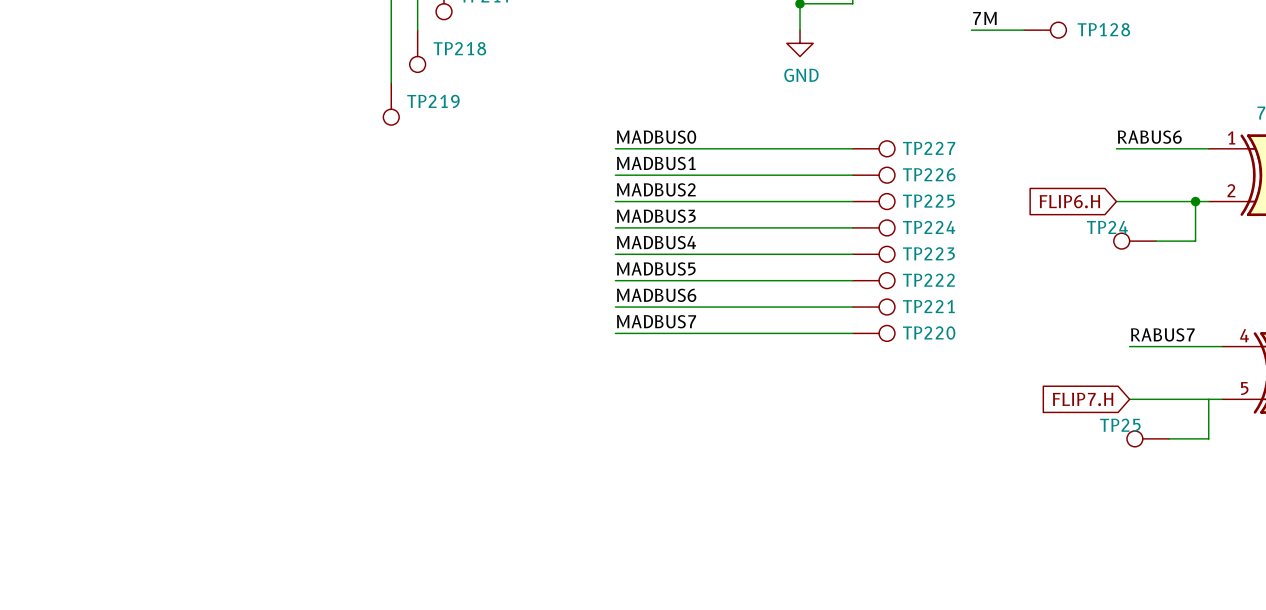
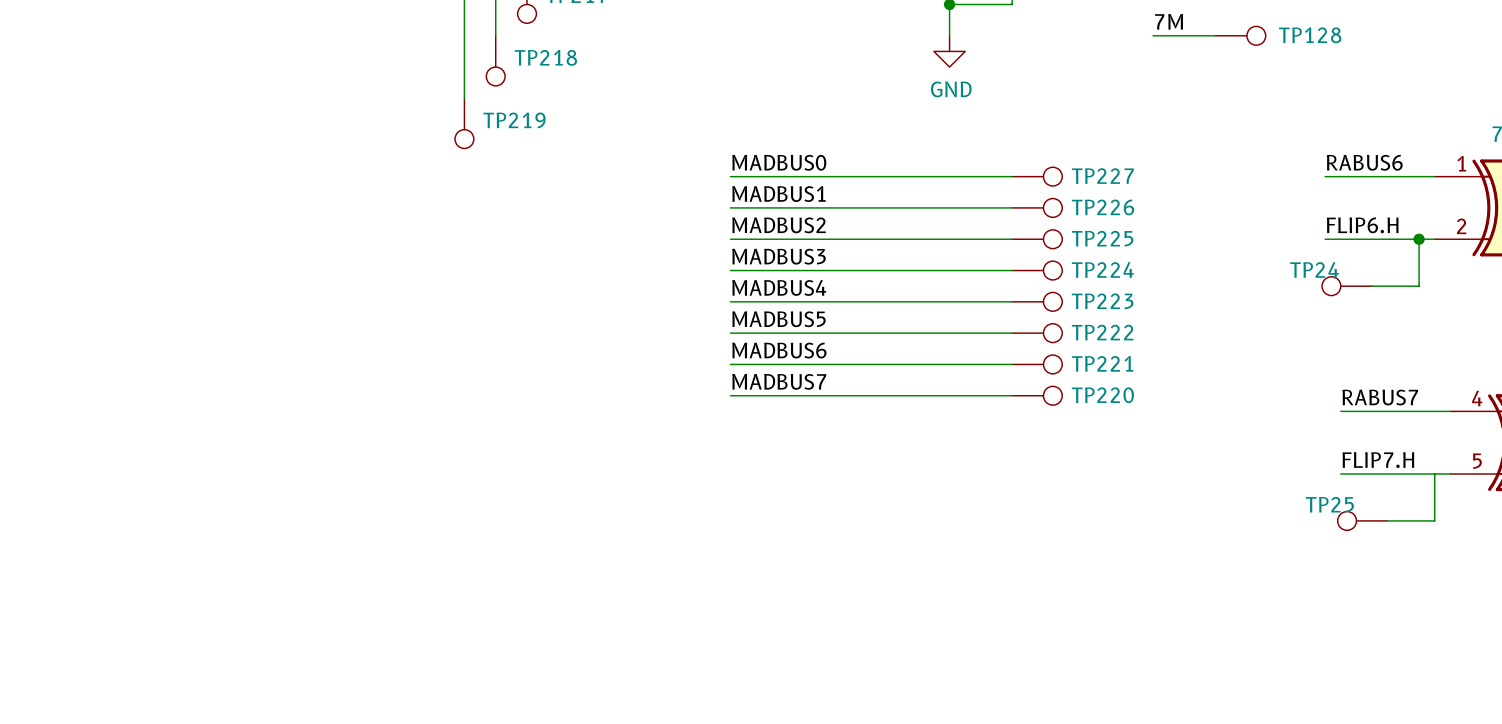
label: none -> FLIP6.H (1362, 225)
global label: FLIP6.H (1069, 201) -> none
label: none -> FLIP7.H (1378, 460)
global label: FLIP7.H (1083, 399) -> none

